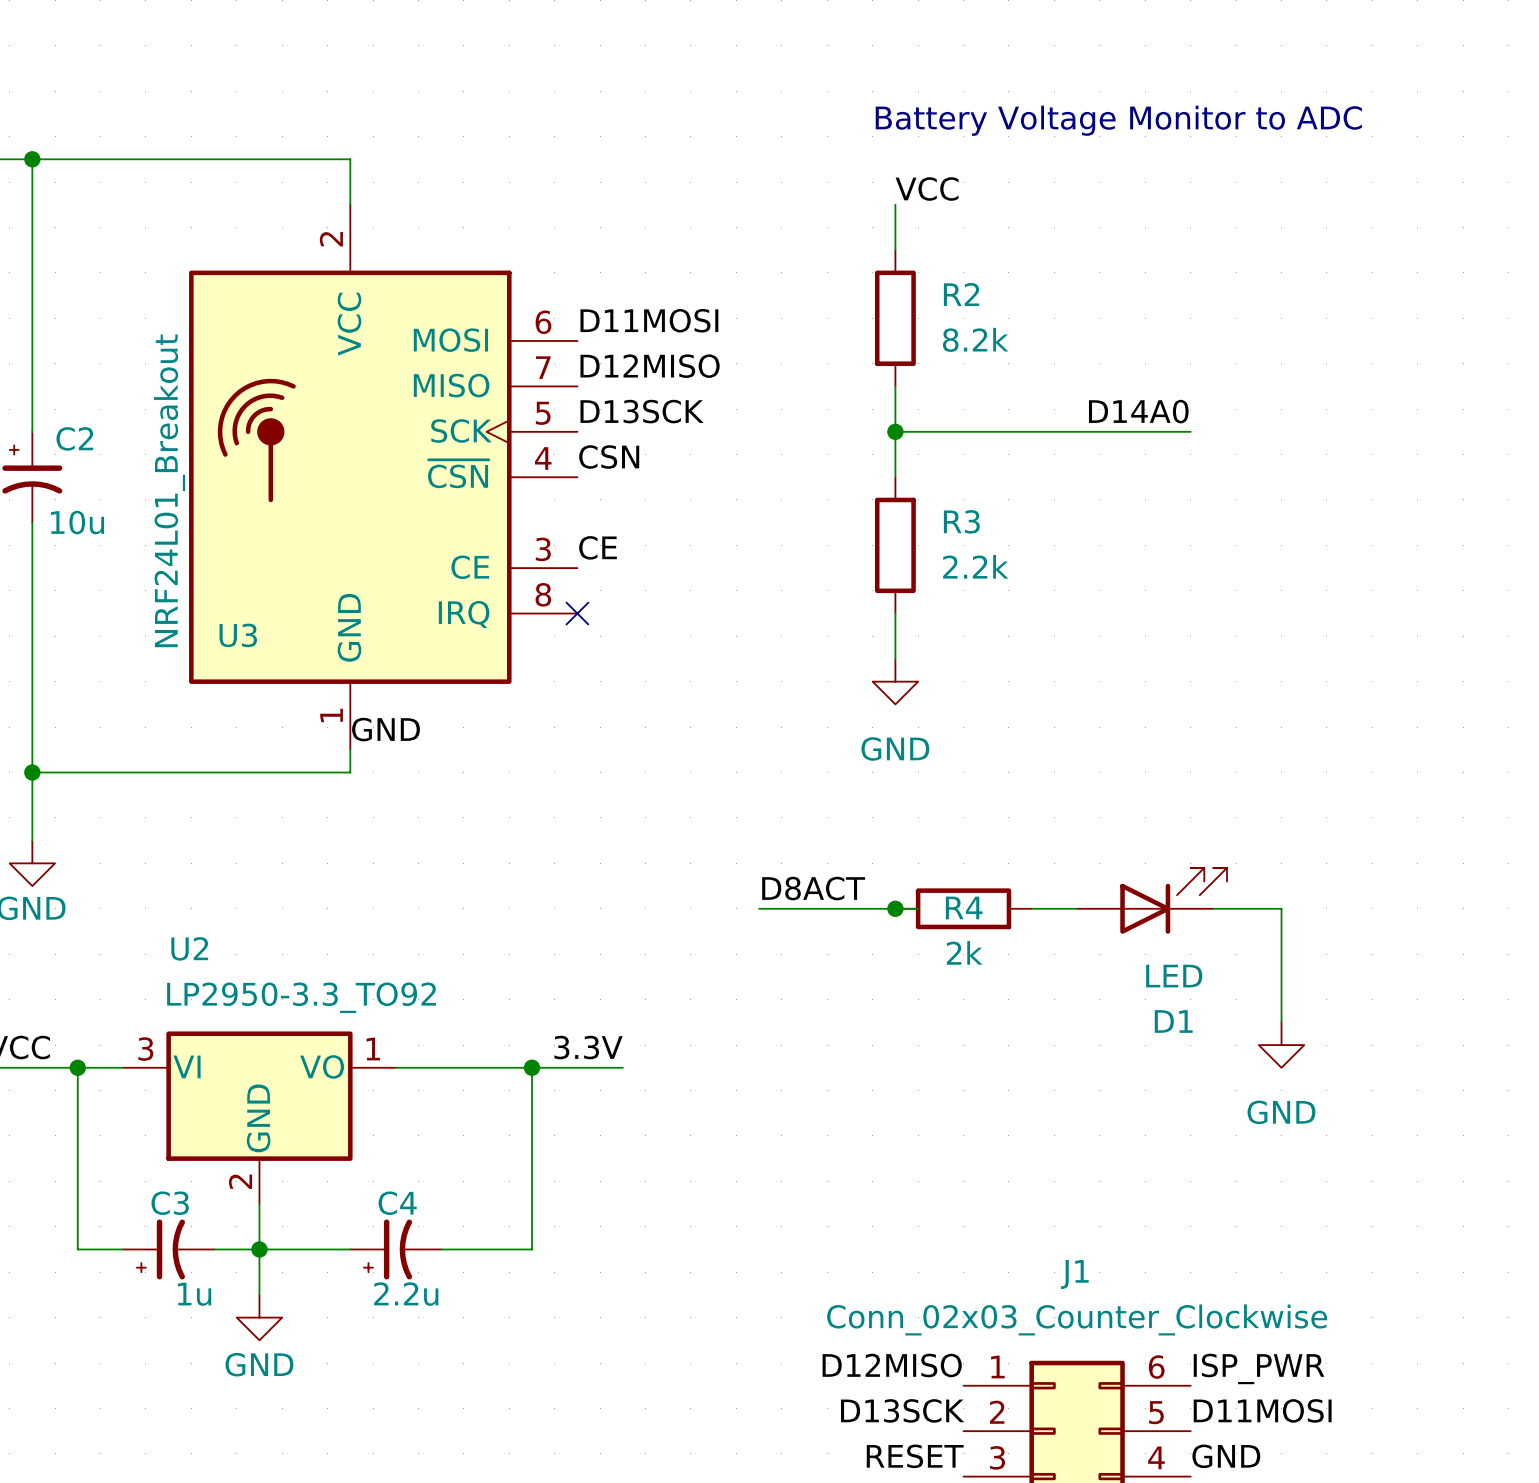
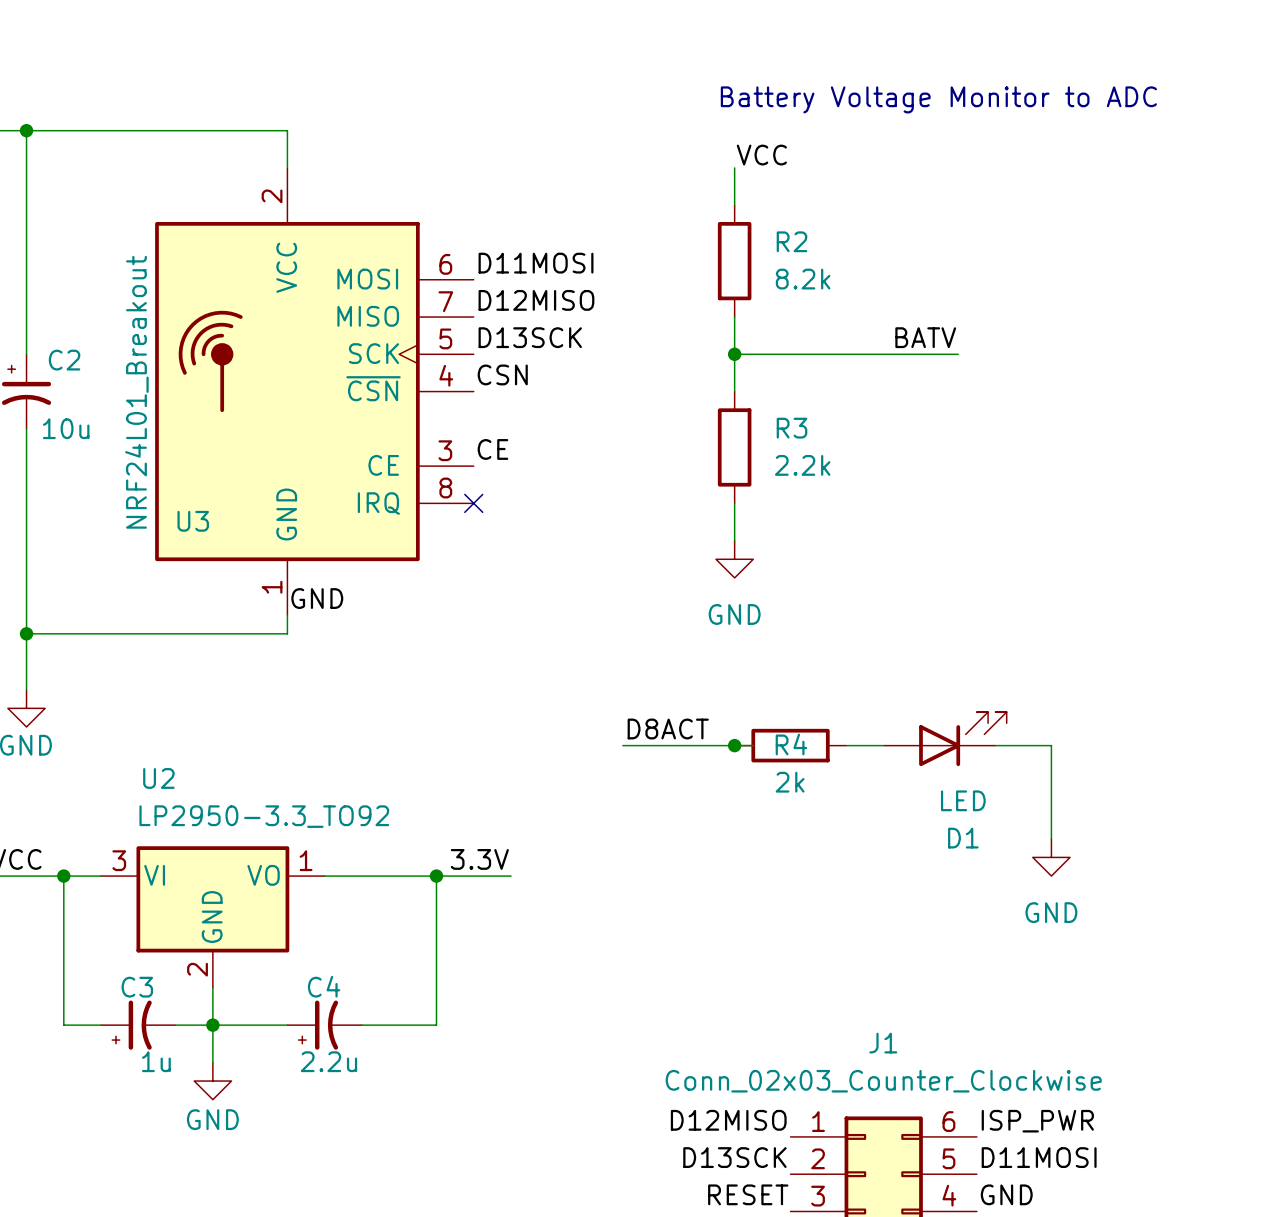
label: none -> BATV (925, 337)
label: D14A0 (1138, 411) -> none
wire: (1167, 431) (1190, 431) -> none

